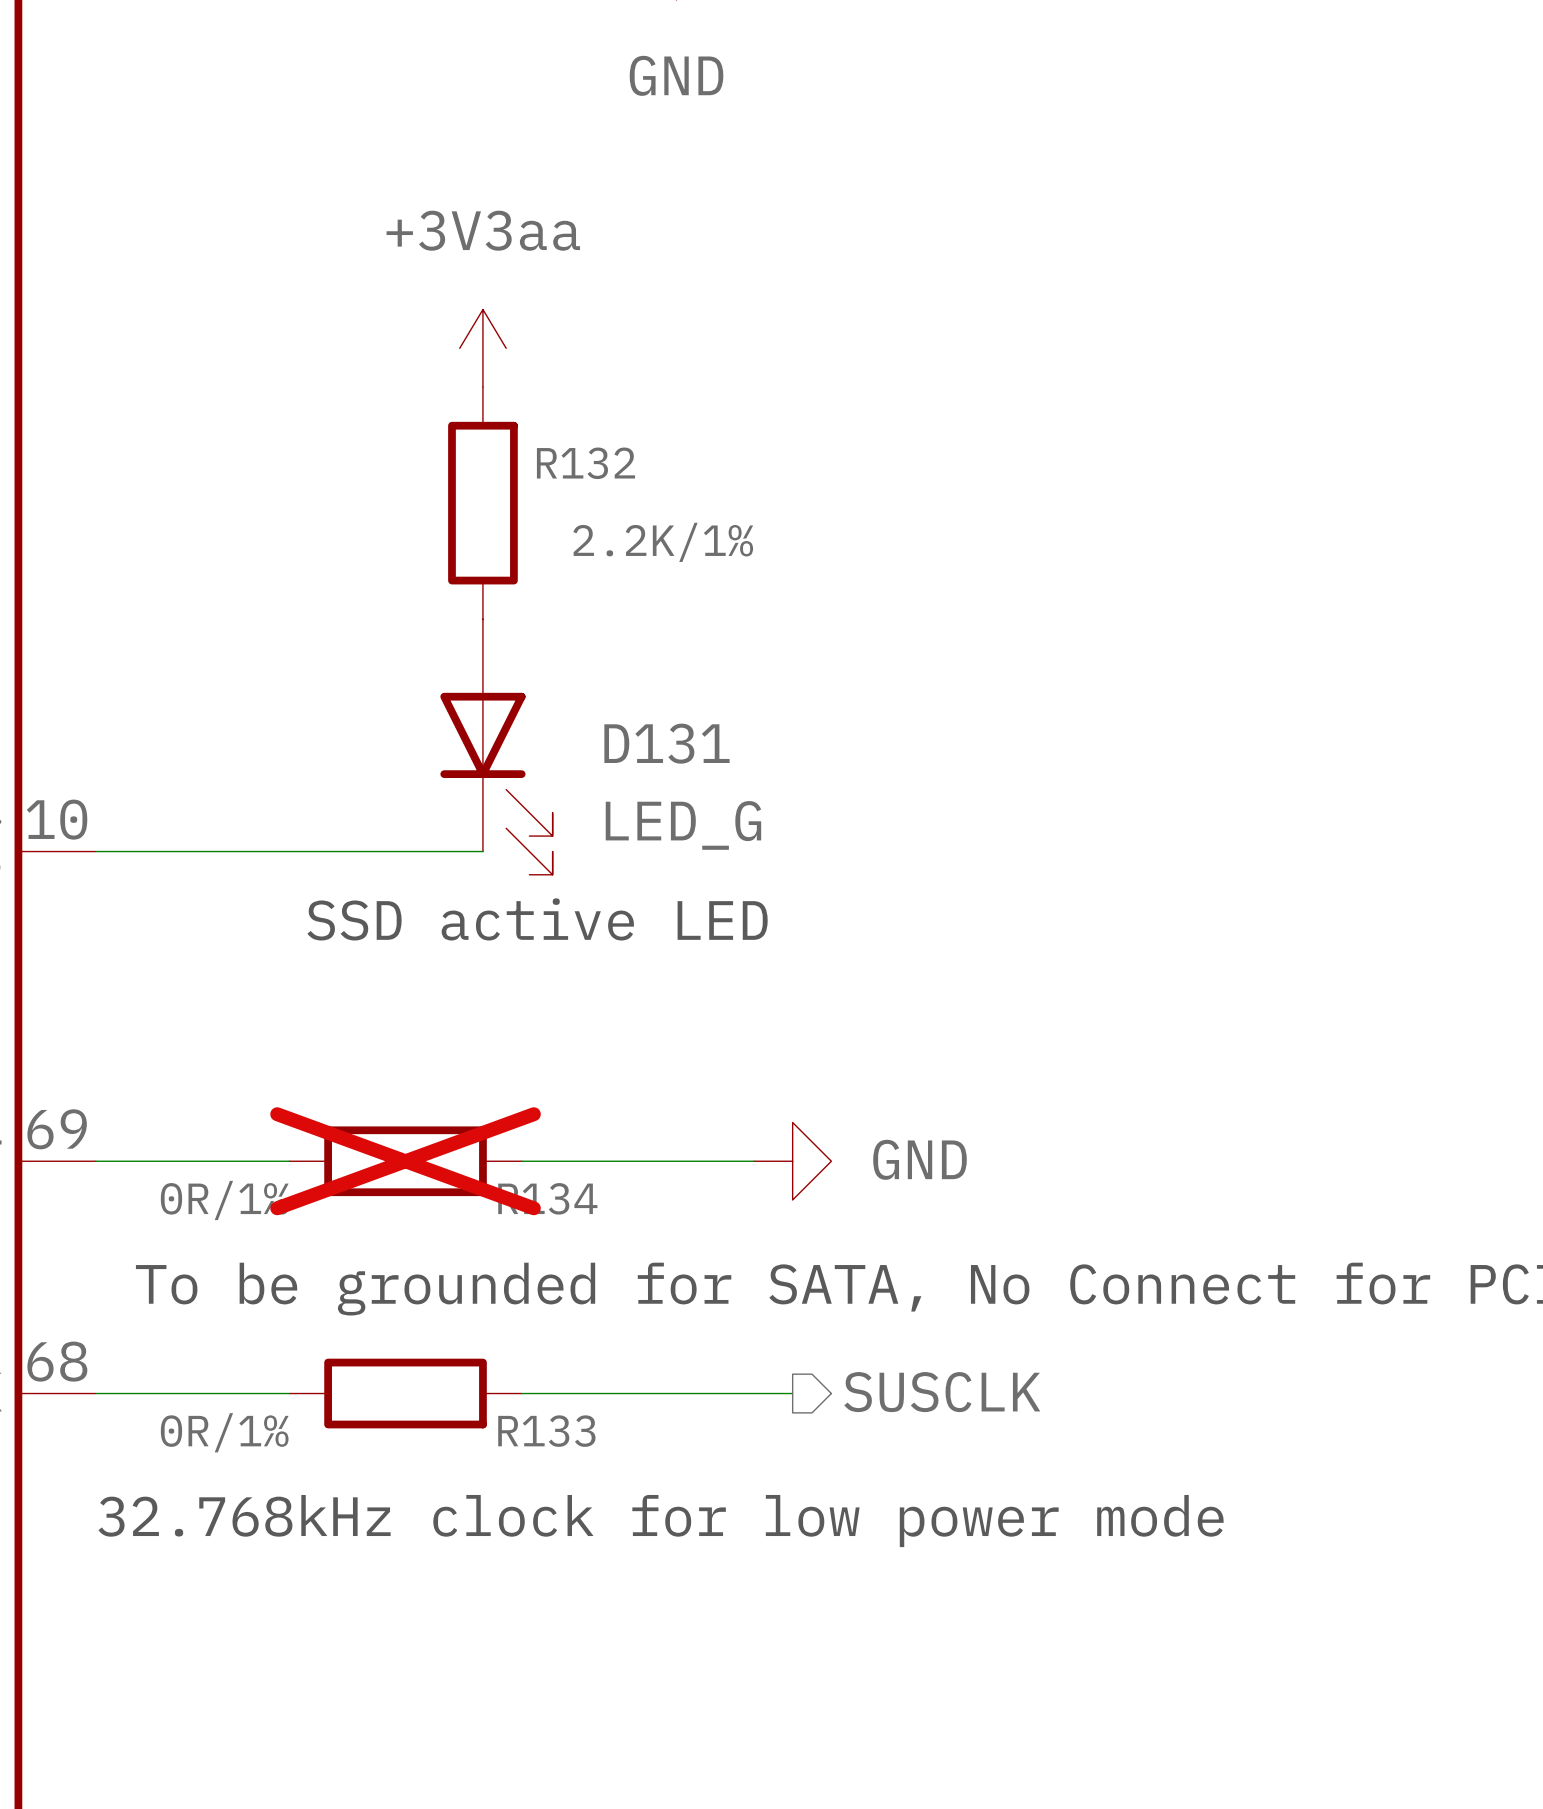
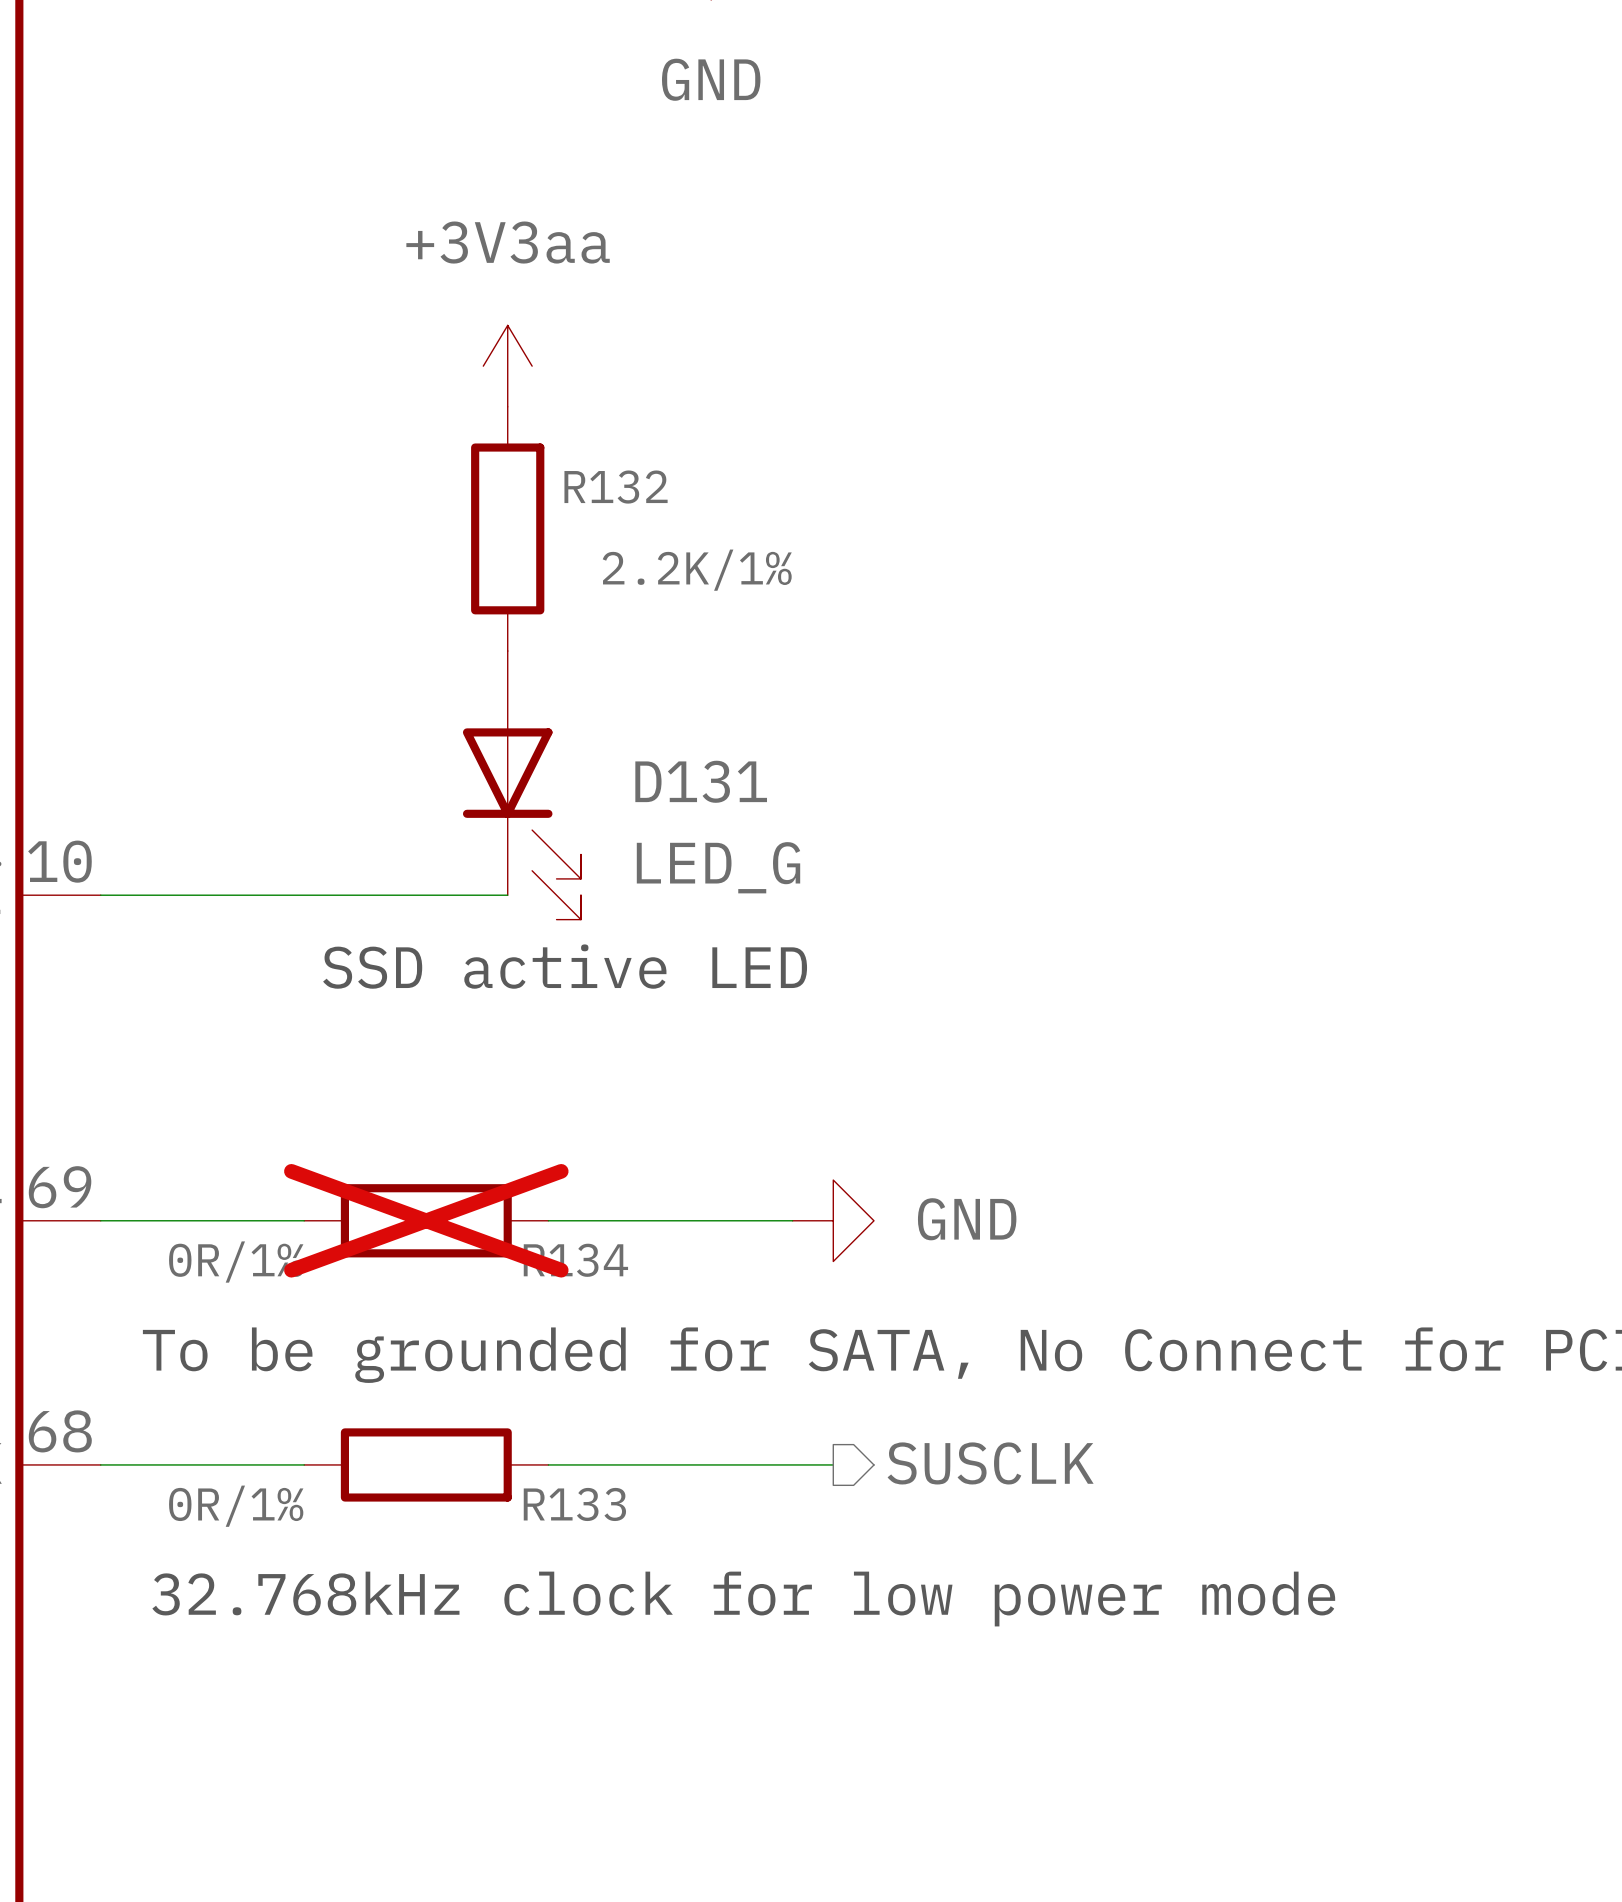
text position: 32.768kHz clock for low power mode (661, 1521) -> 32.768kHz clock for low power mode (743, 1599)

